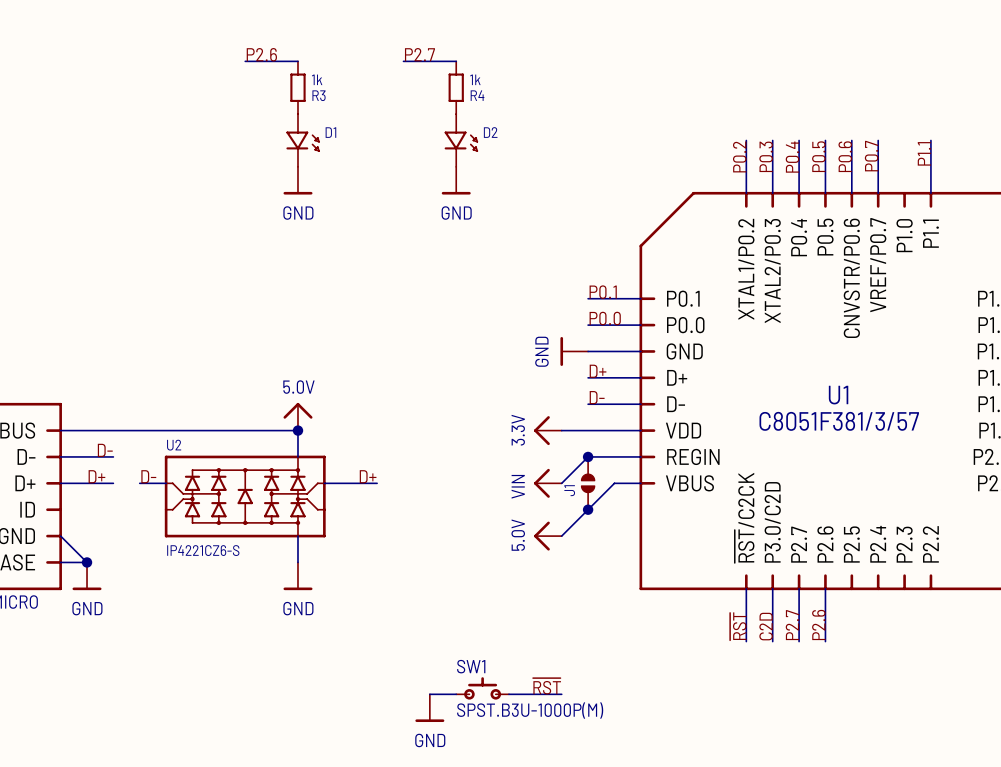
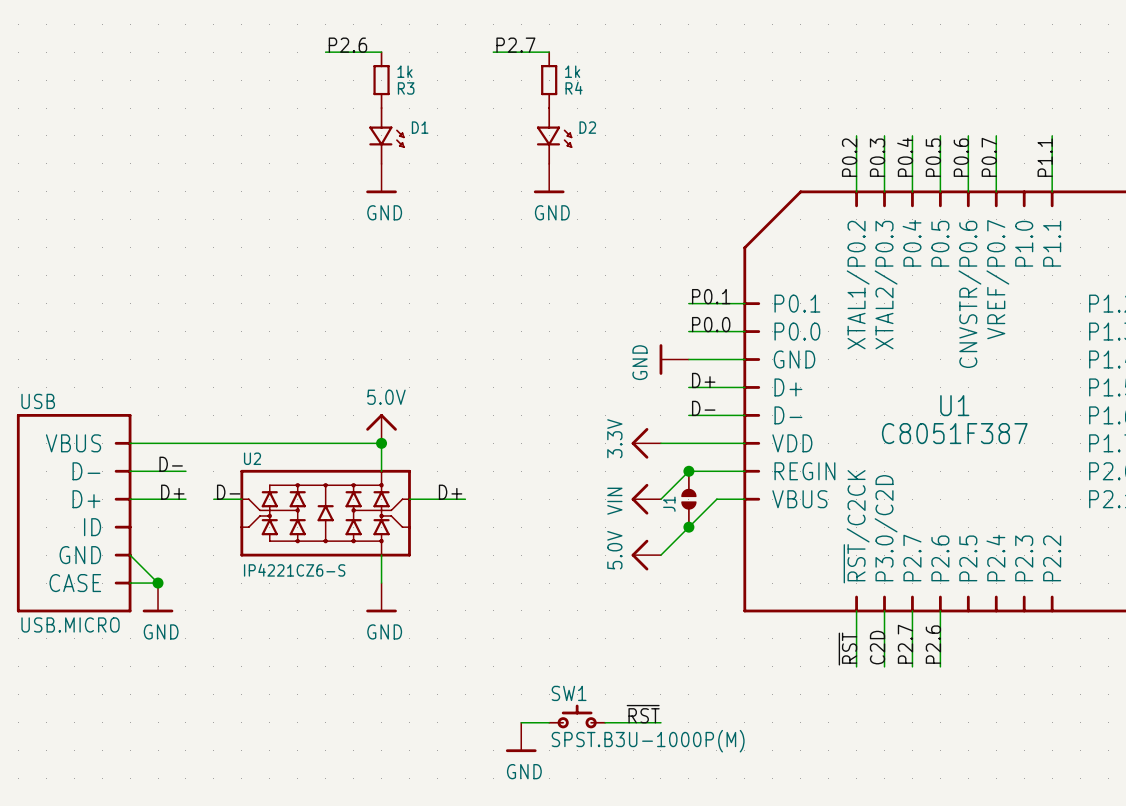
U1 value: C8051F381/3/57 (839, 421) -> C8051F387 (954, 433)

